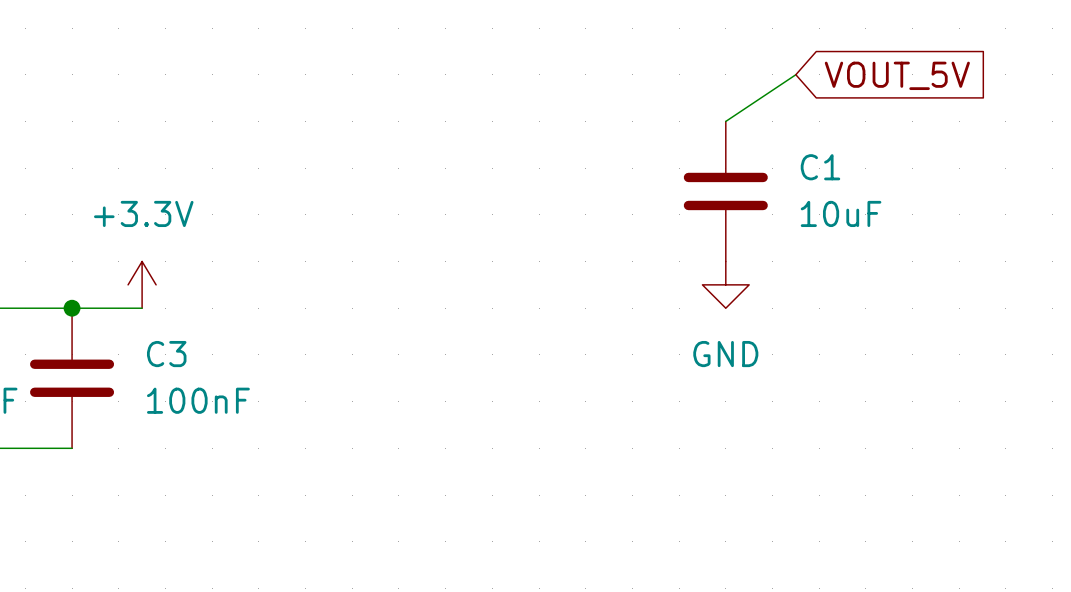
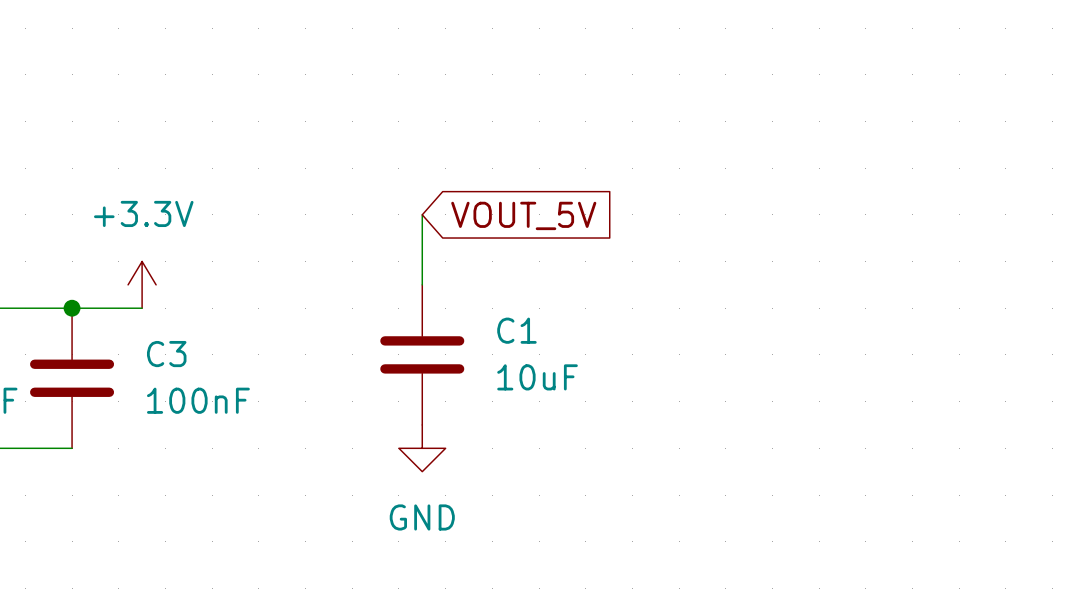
wire: (795, 74) (725, 121) -> none
global label position: VOUT_5V (897, 75) -> VOUT_5V (523, 215)
C1 position: (725, 191) -> (422, 354)
wire: none -> (422, 214) (422, 284)
power symbol position: GND (725, 284) -> GND (422, 448)

